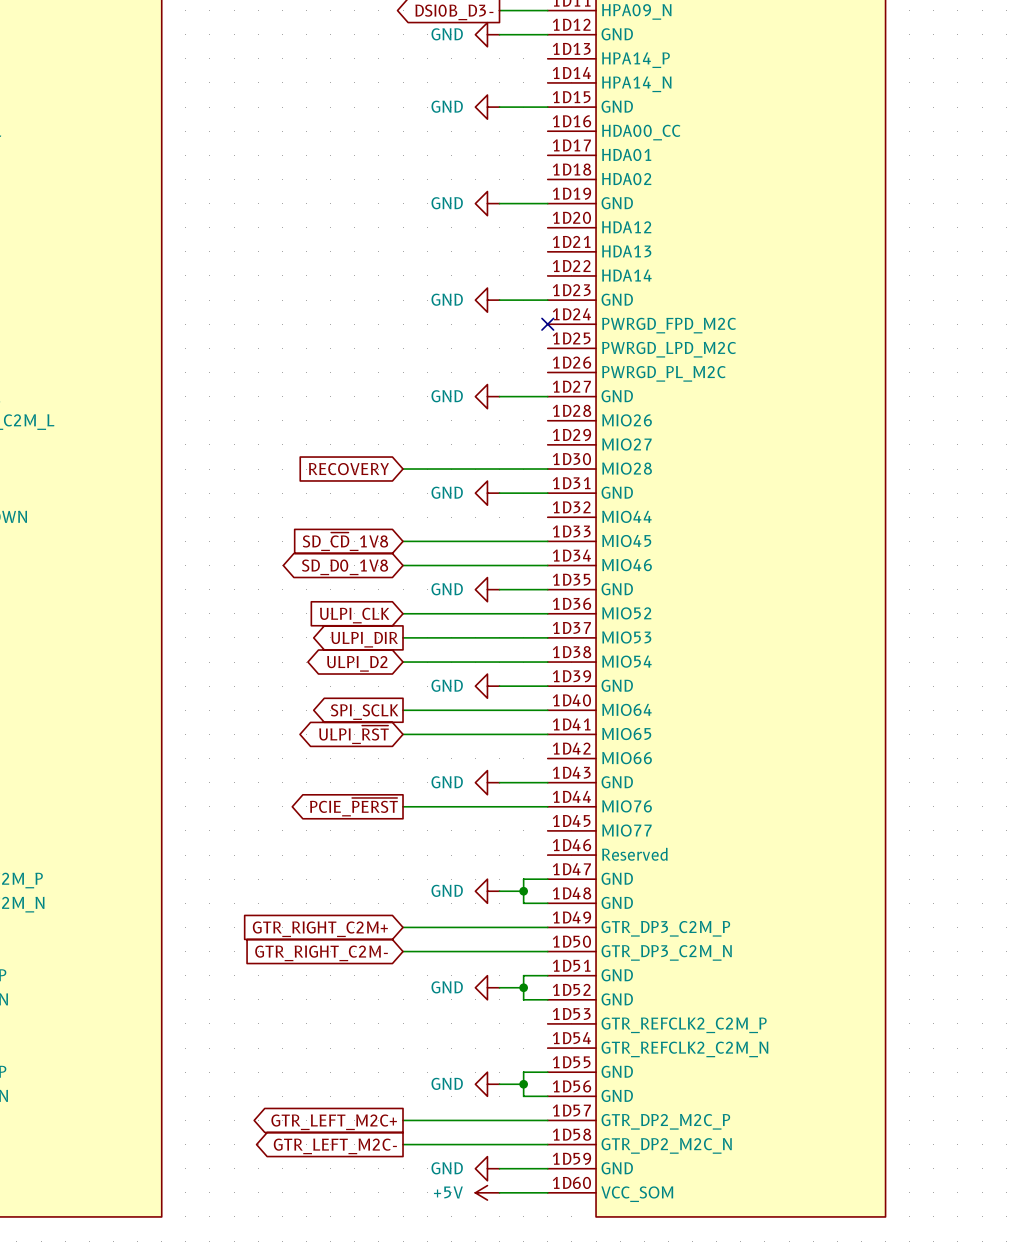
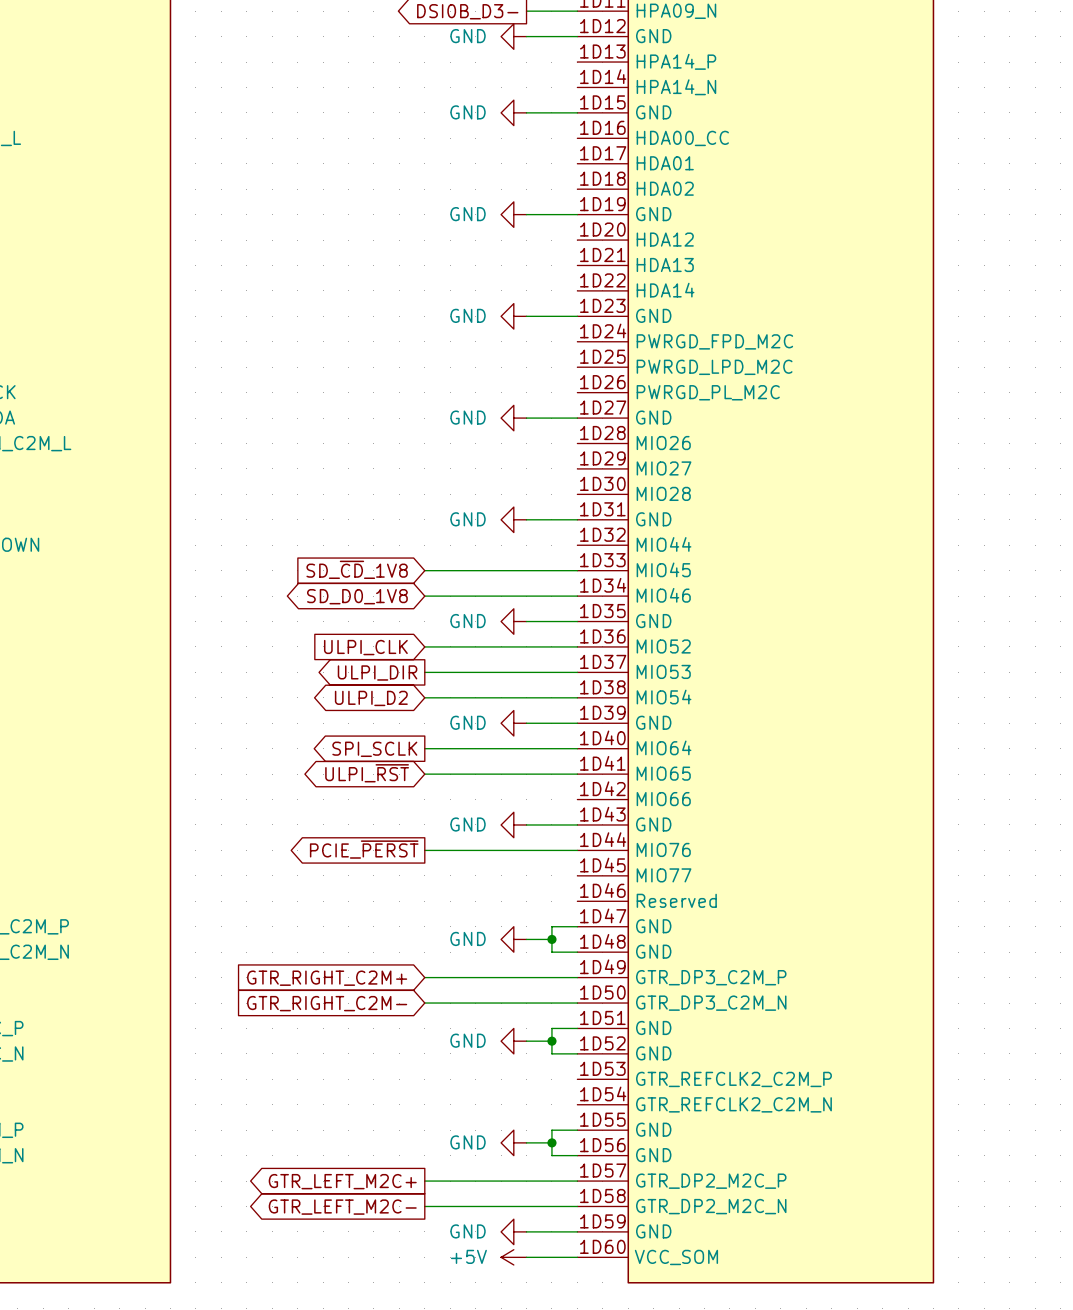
no-connect mark: (547, 324) -> none
global label: RECOVERY (348, 469) -> none
wire: (403, 469) (547, 469) -> none

